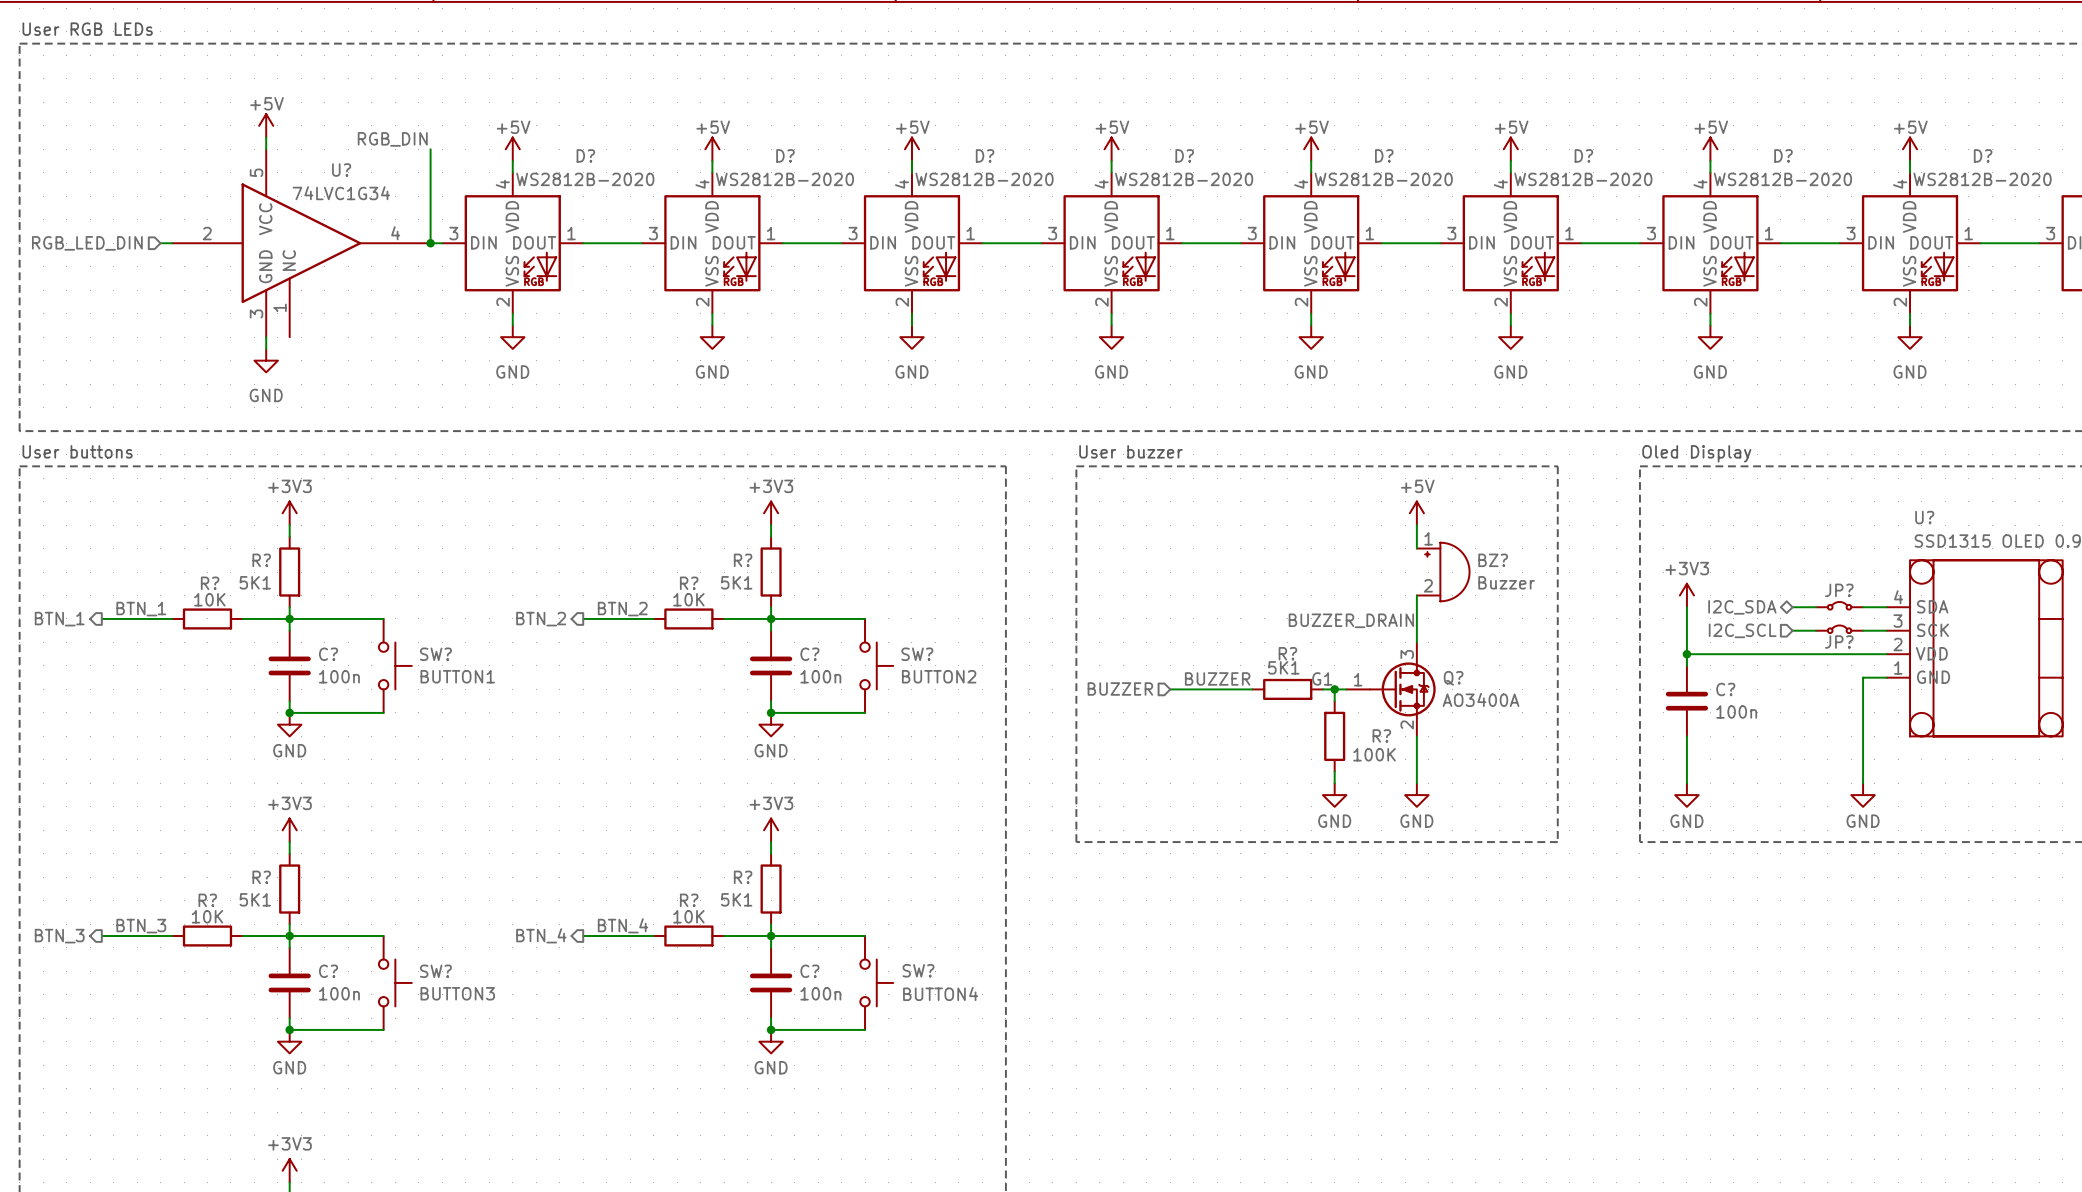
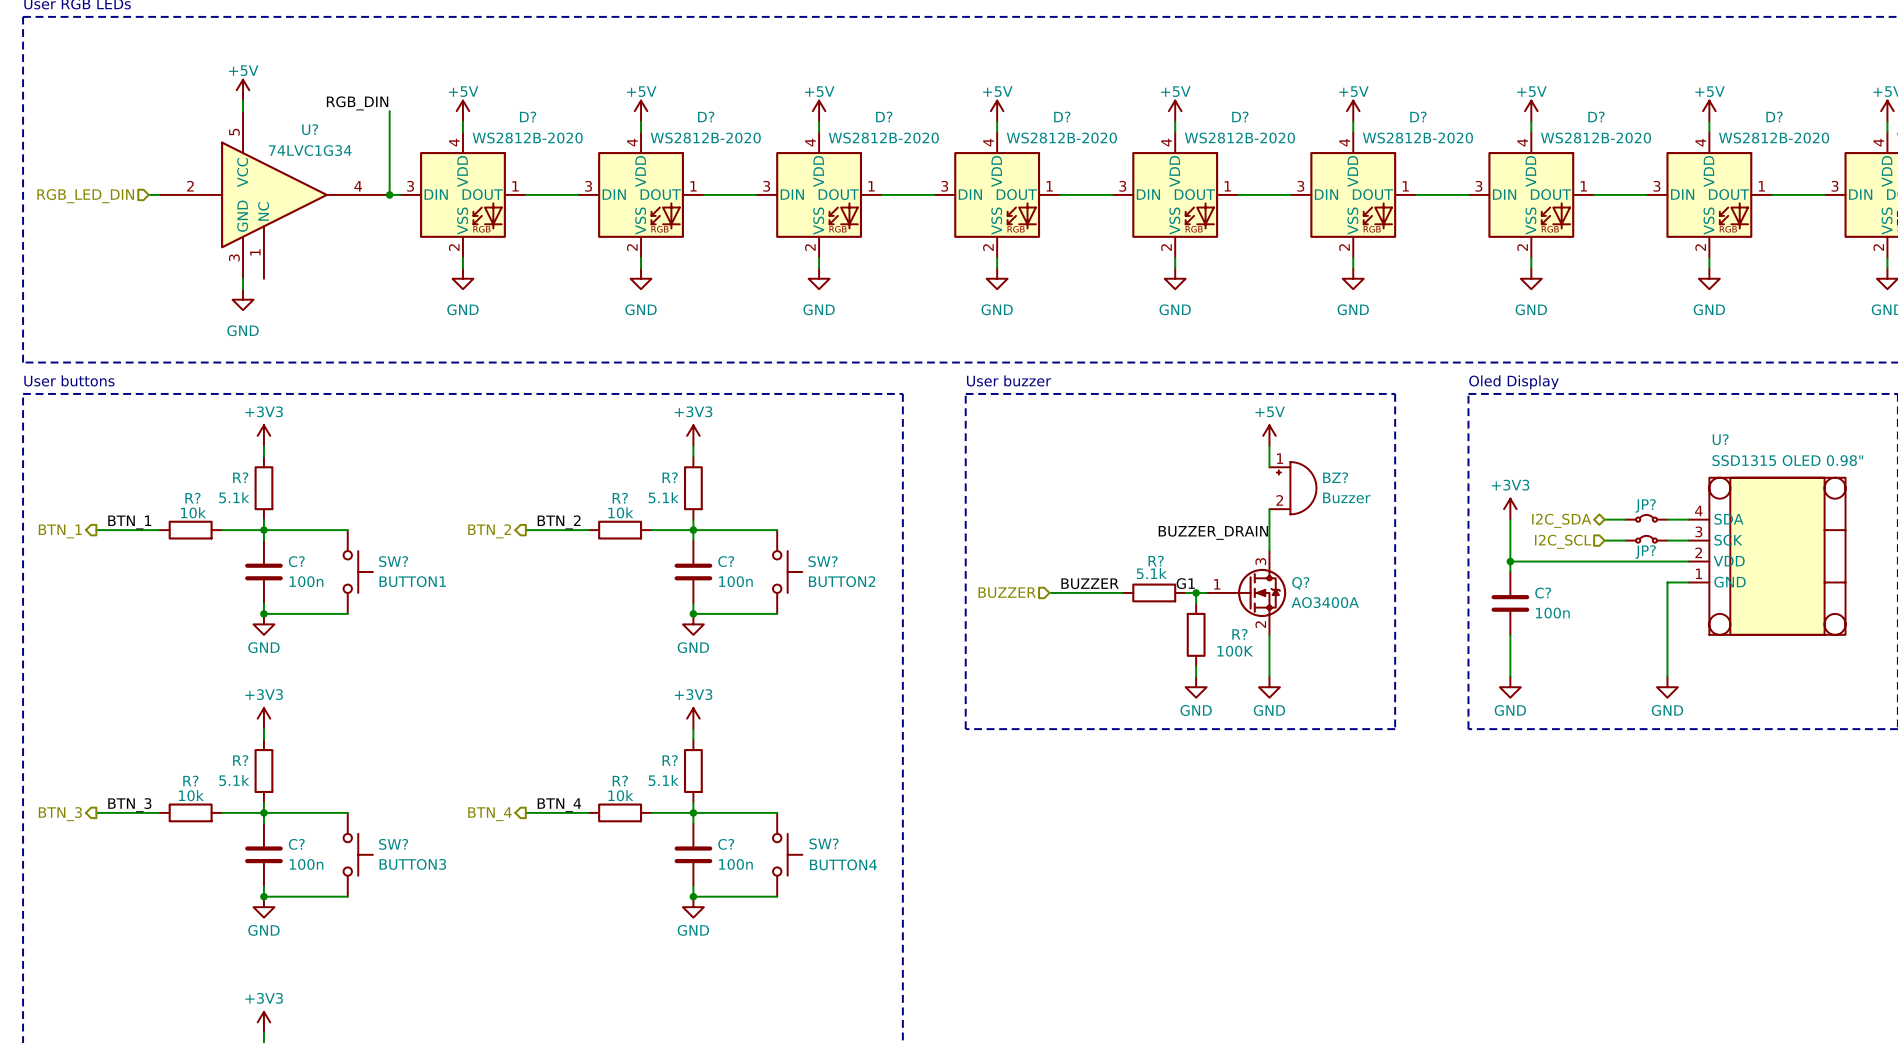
R? value: 5K1 (255, 582) -> 5.1k (234, 497)
R? value: 5K1 (736, 582) -> 5.1k (663, 497)
R? value: 10K (209, 599) -> 10k (193, 512)
R? value: 10K (688, 599) -> 10k (620, 512)
R? value: 5K1 (1283, 667) -> 5.1k (1151, 573)
R? value: 5K1 (255, 899) -> 5.1k (234, 780)
R? value: 5K1 (736, 899) -> 5.1k (663, 780)
R? value: 10K (207, 916) -> 10k (191, 795)
R? value: 10K (688, 916) -> 10k (620, 795)

